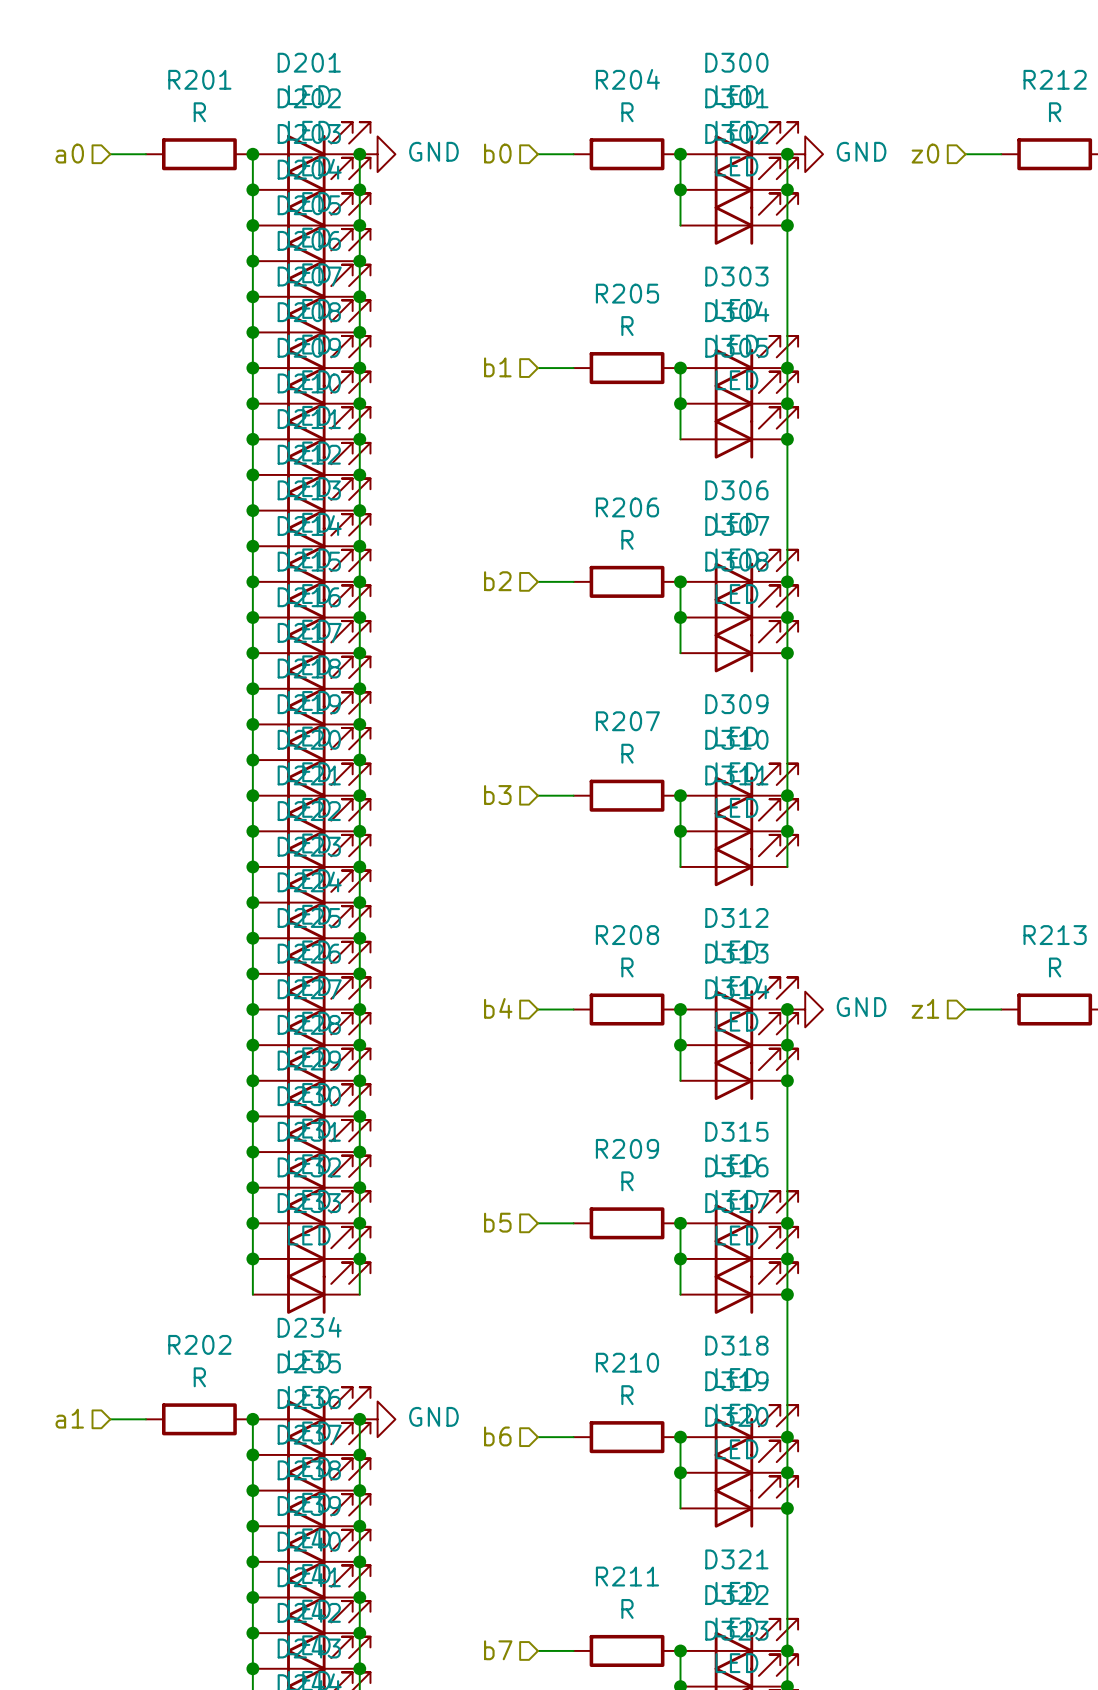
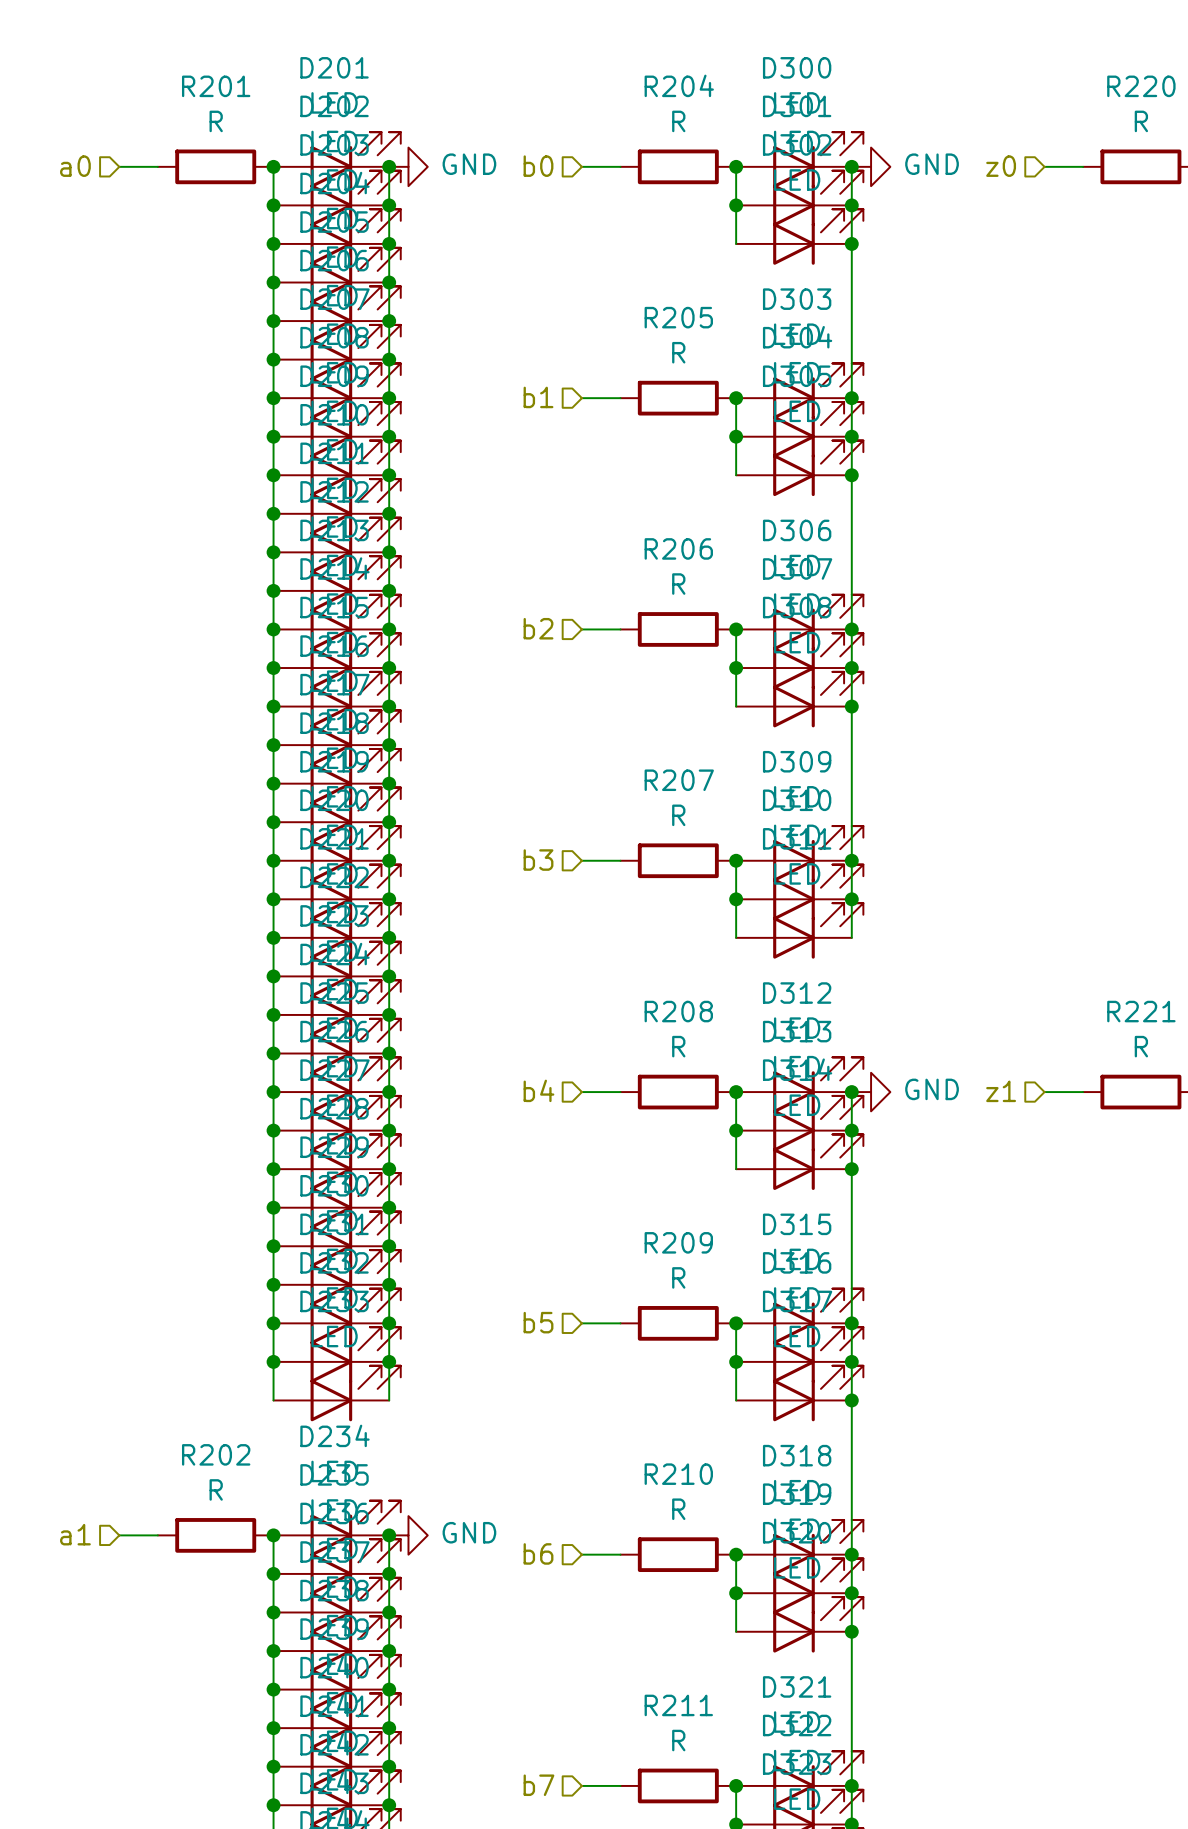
R212 name: R212 (1055, 79) -> R220 (1141, 86)
R213 name: R213 (1055, 935) -> R221 (1141, 1011)

